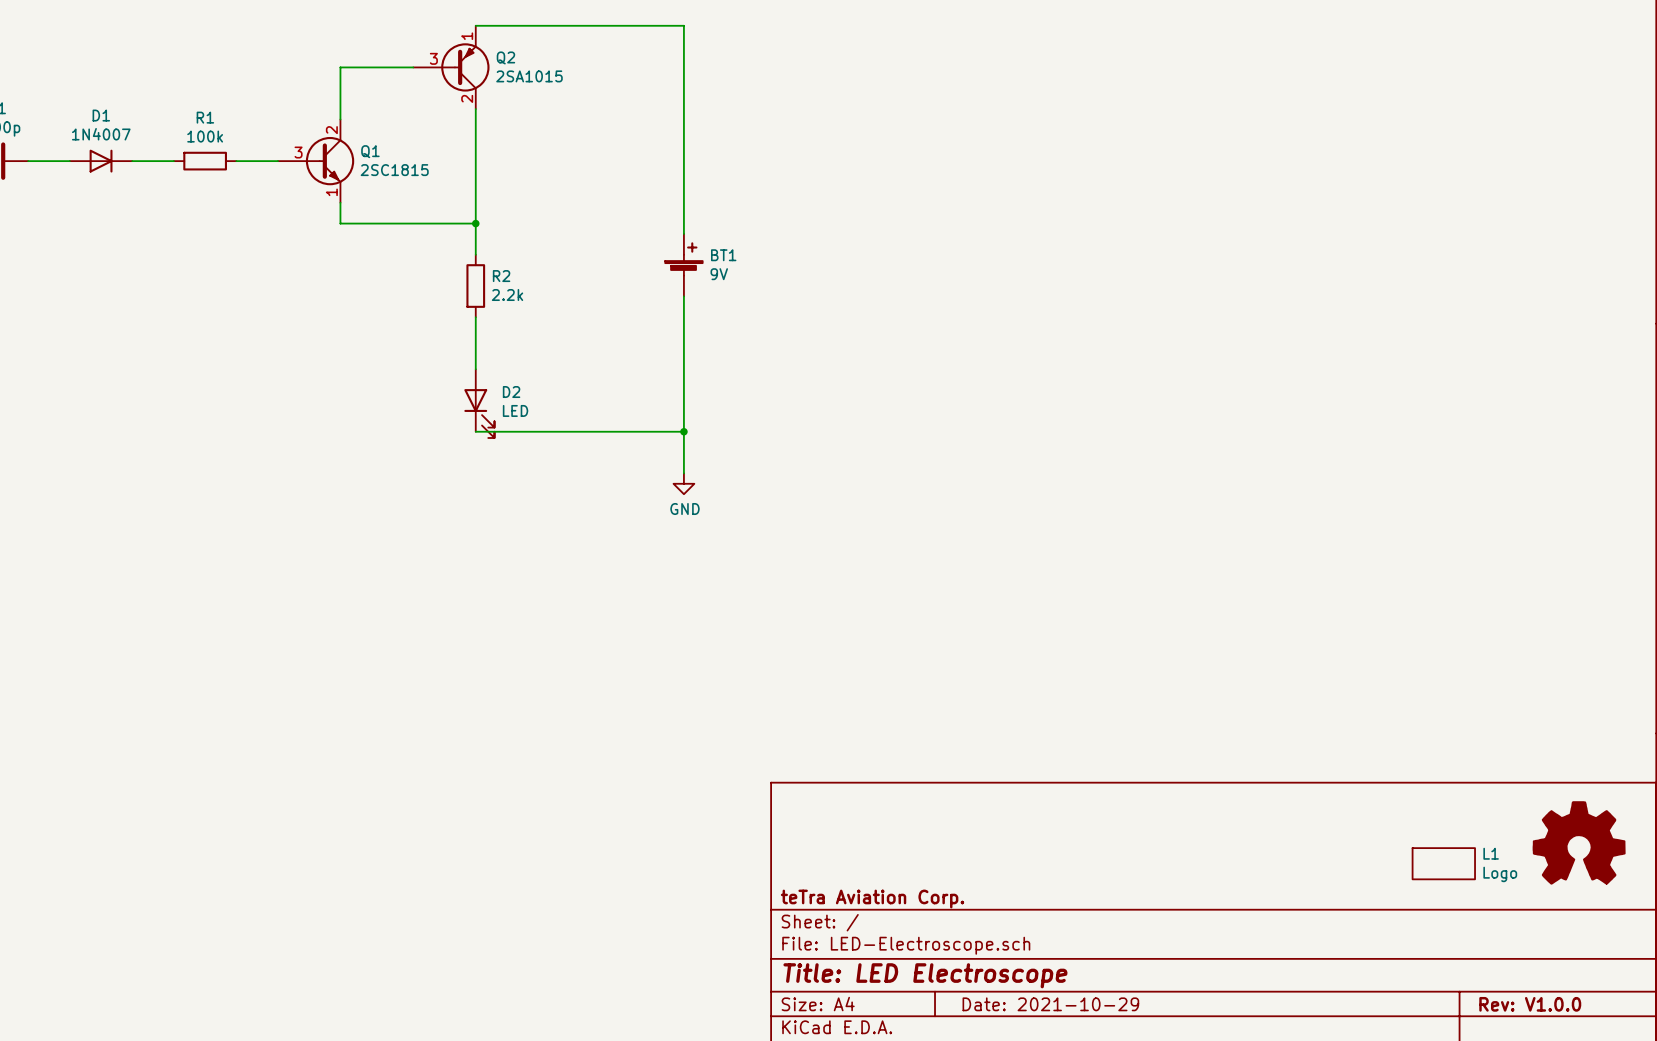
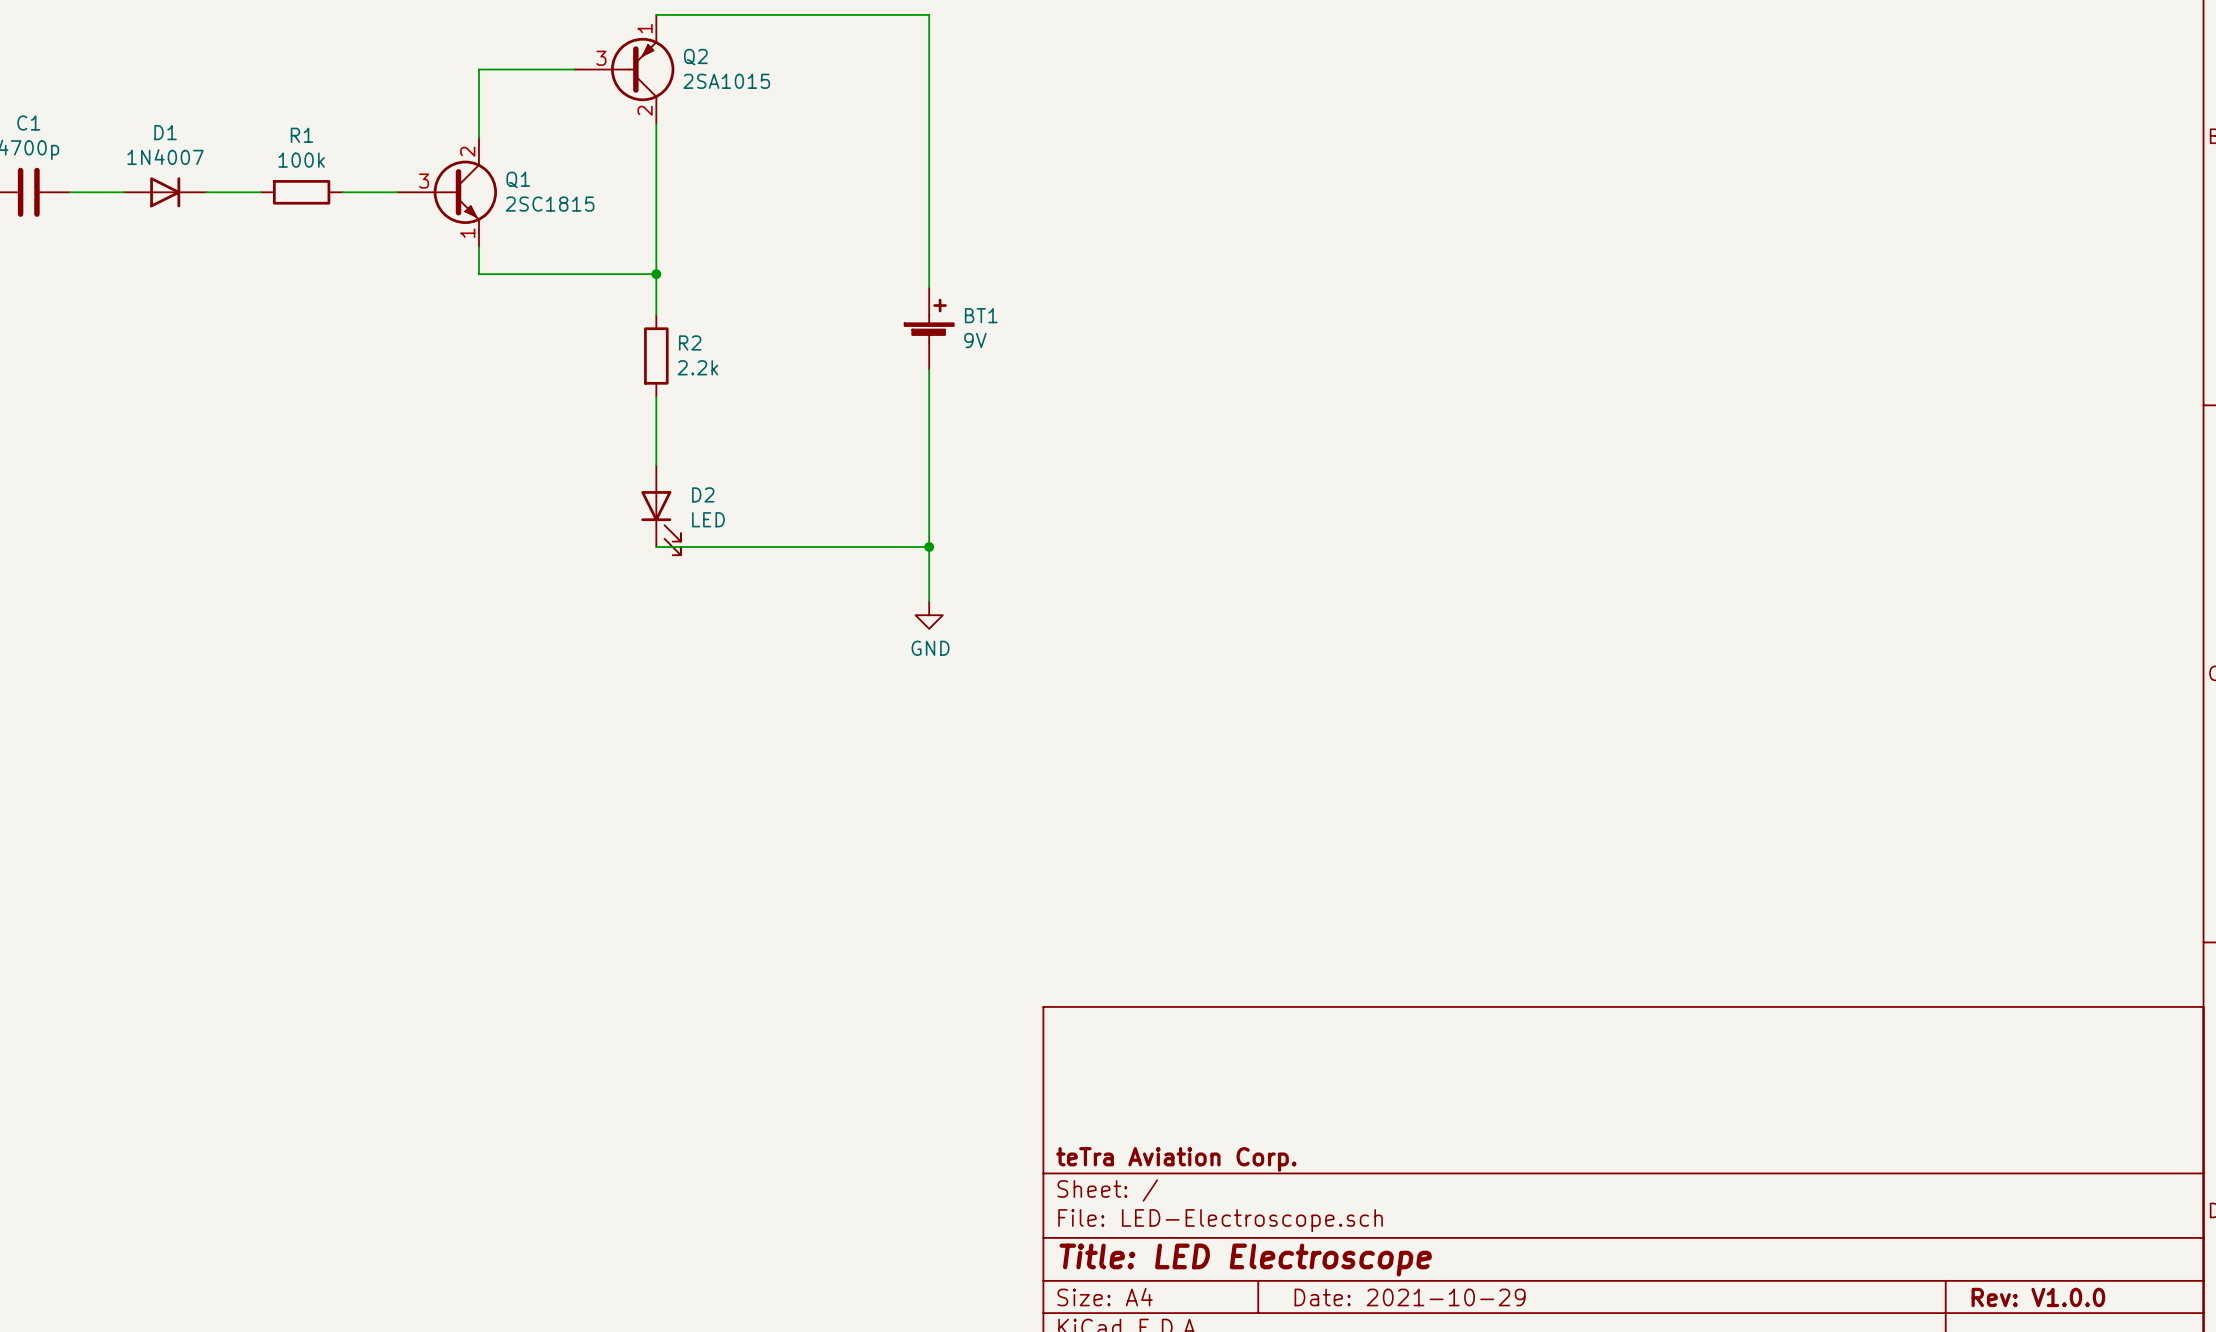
power symbol: (1579, 842) -> none
L1: Logo (1443, 863) -> none

